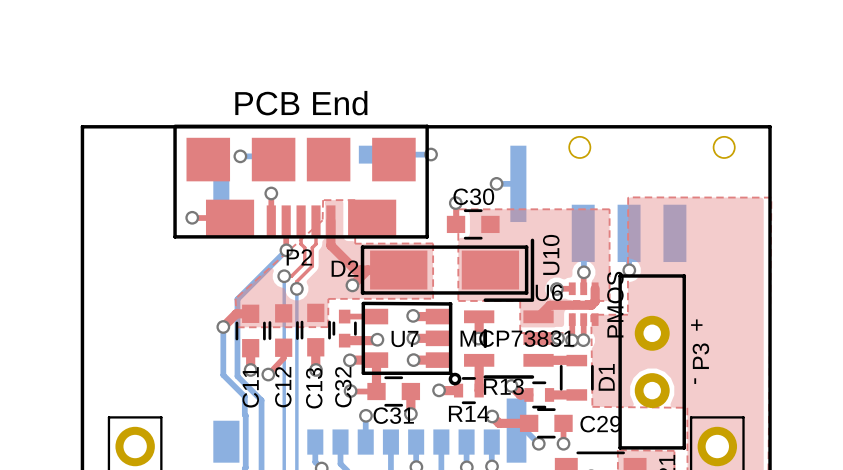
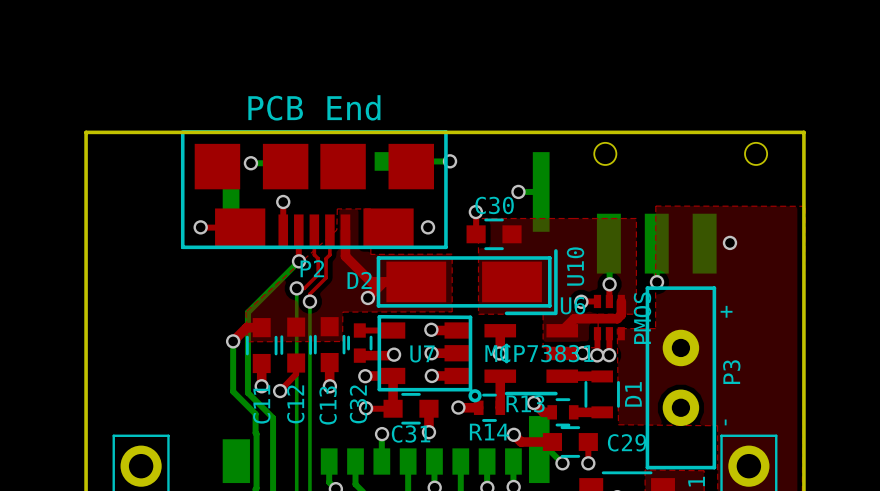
via: none -> (428, 227)
via: none -> (729, 242)

